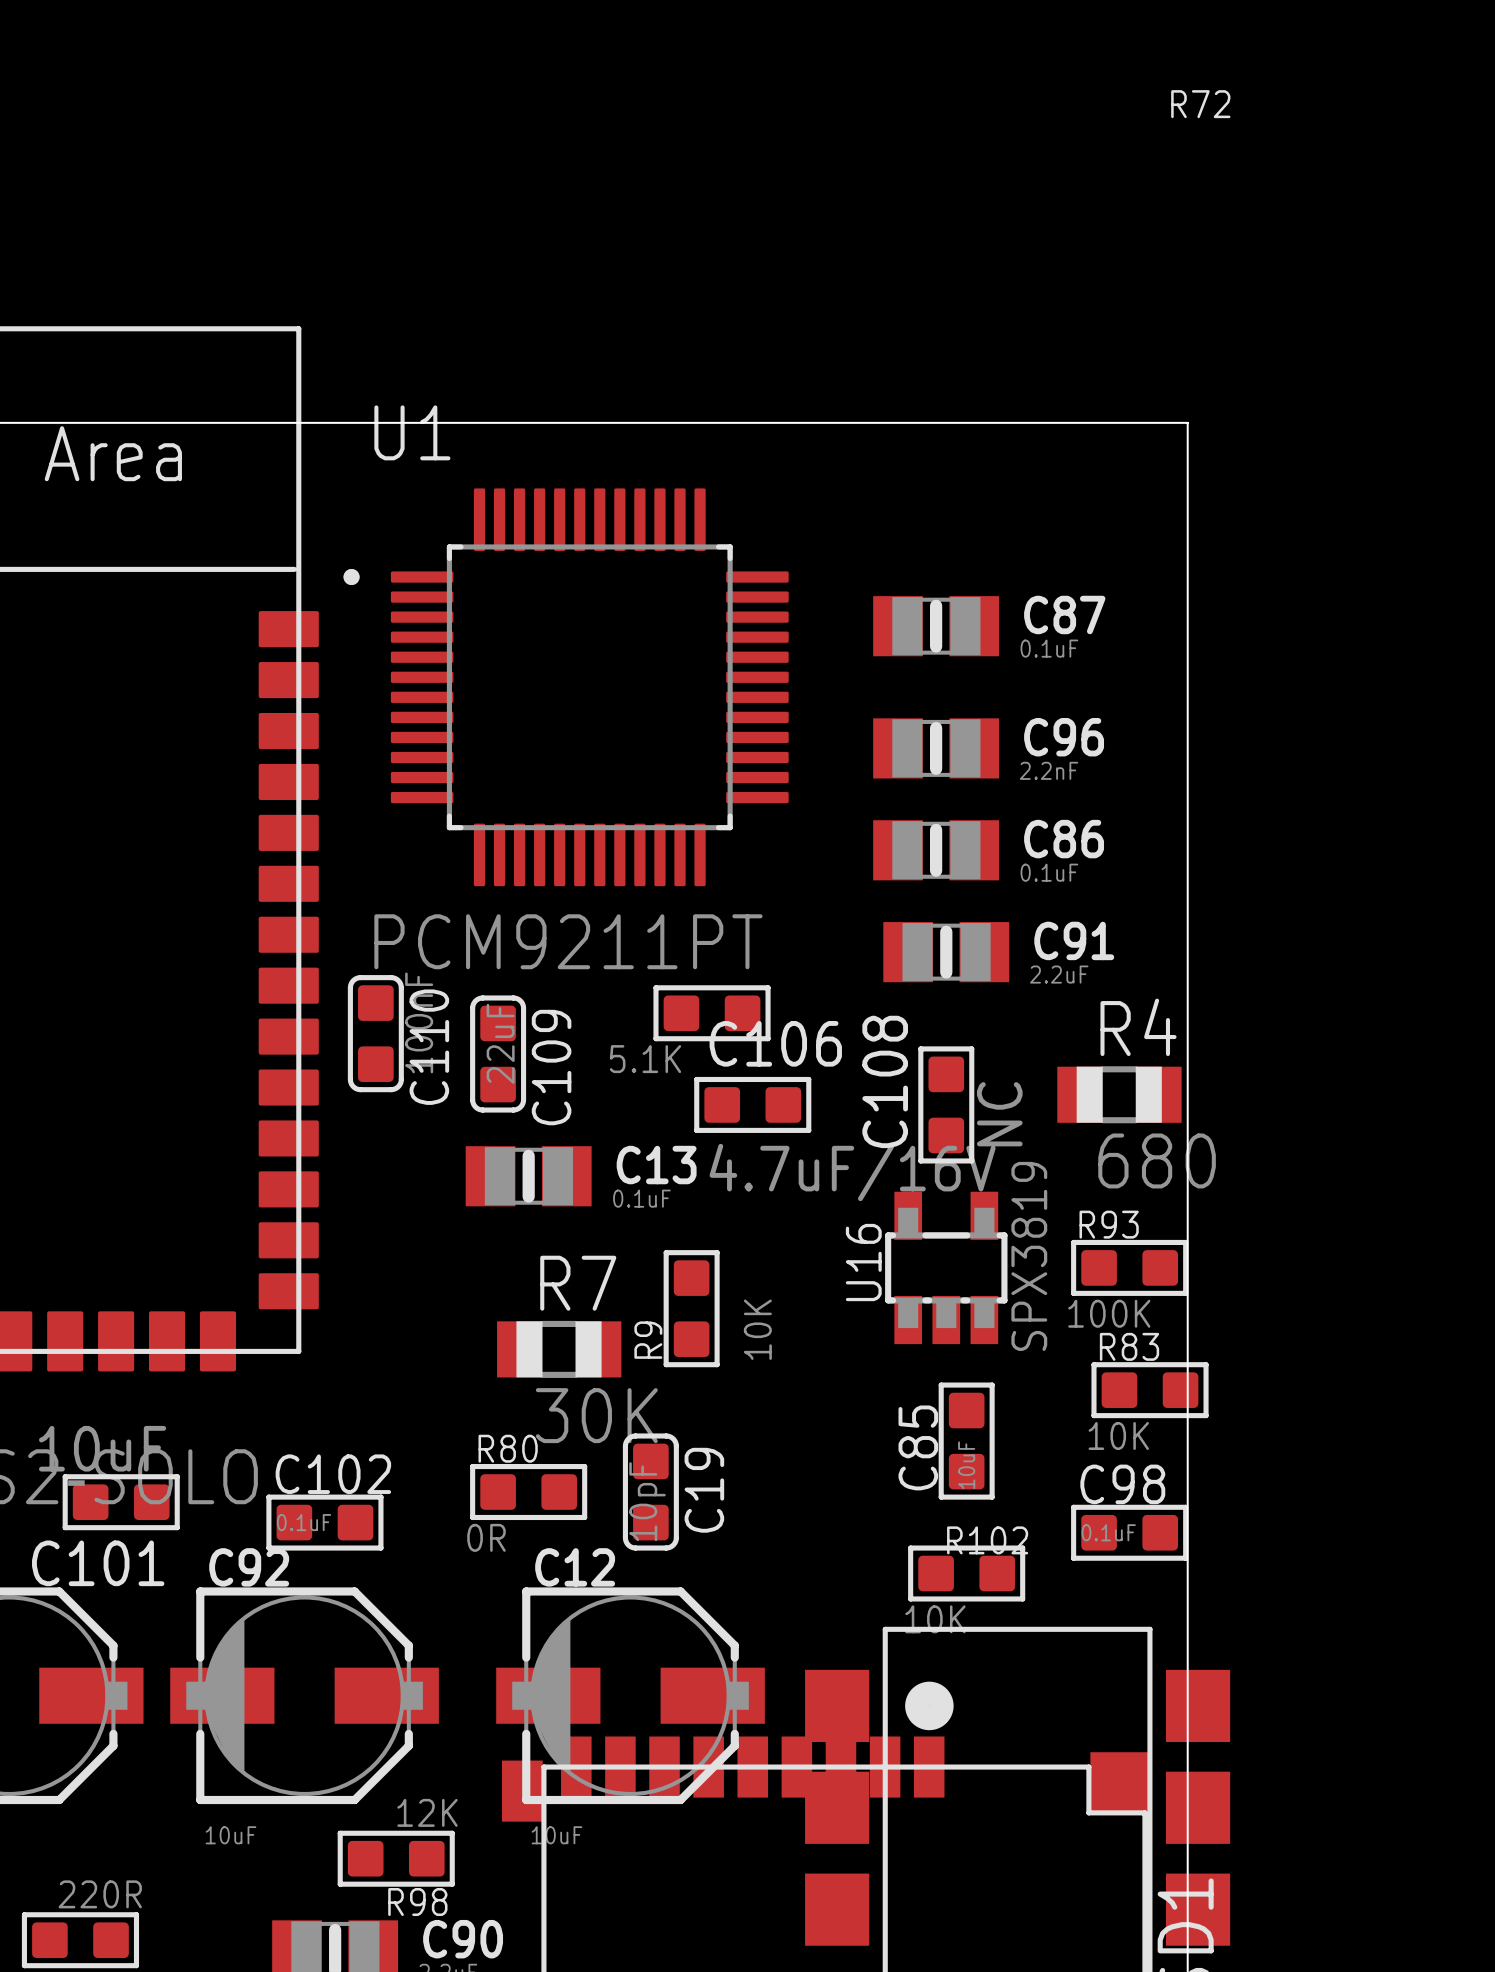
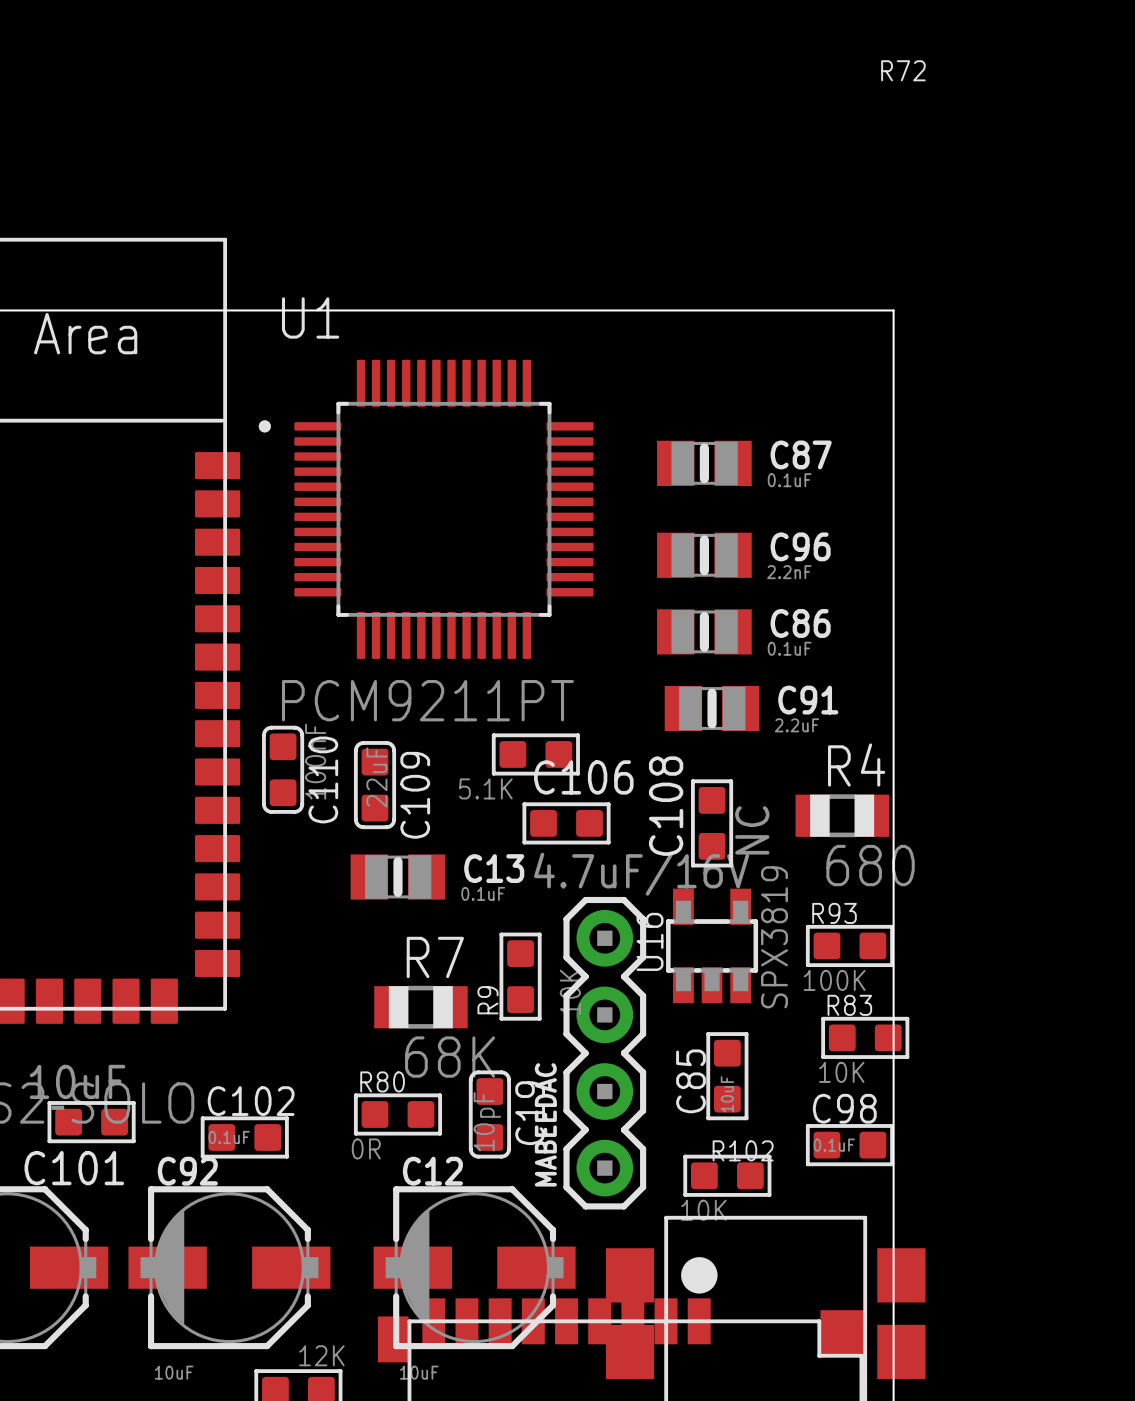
MABEEDAC: none -> (604, 1053)
R7 value: 30K (596, 1415) -> 68K (450, 1057)

